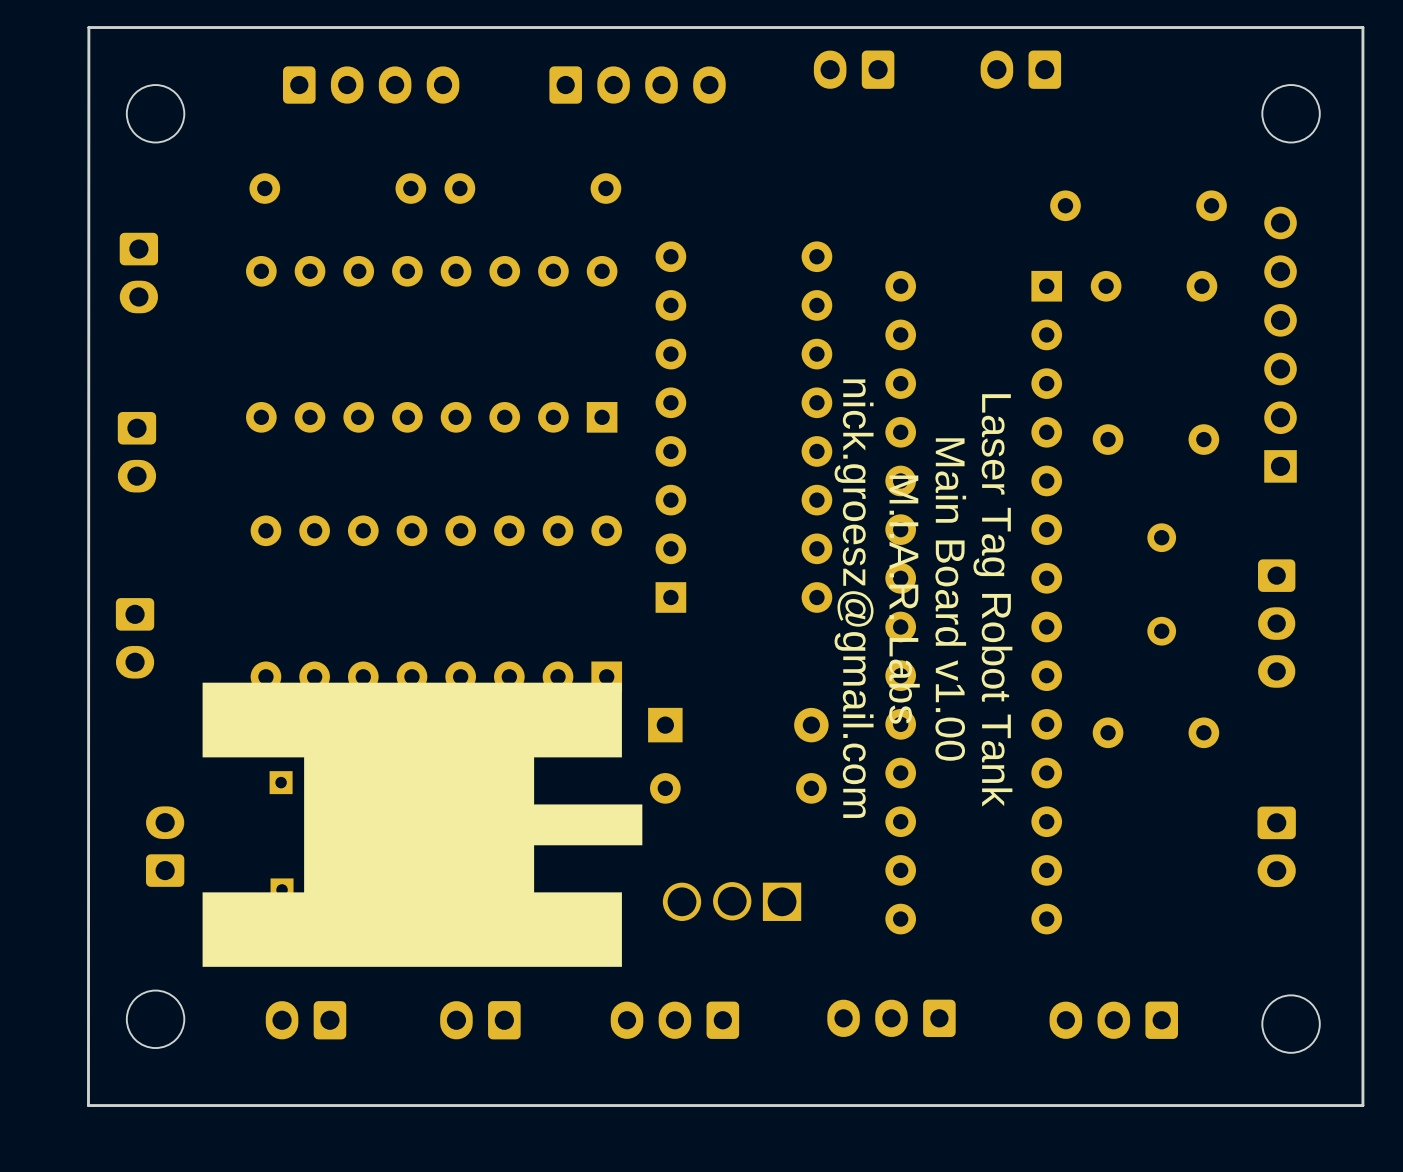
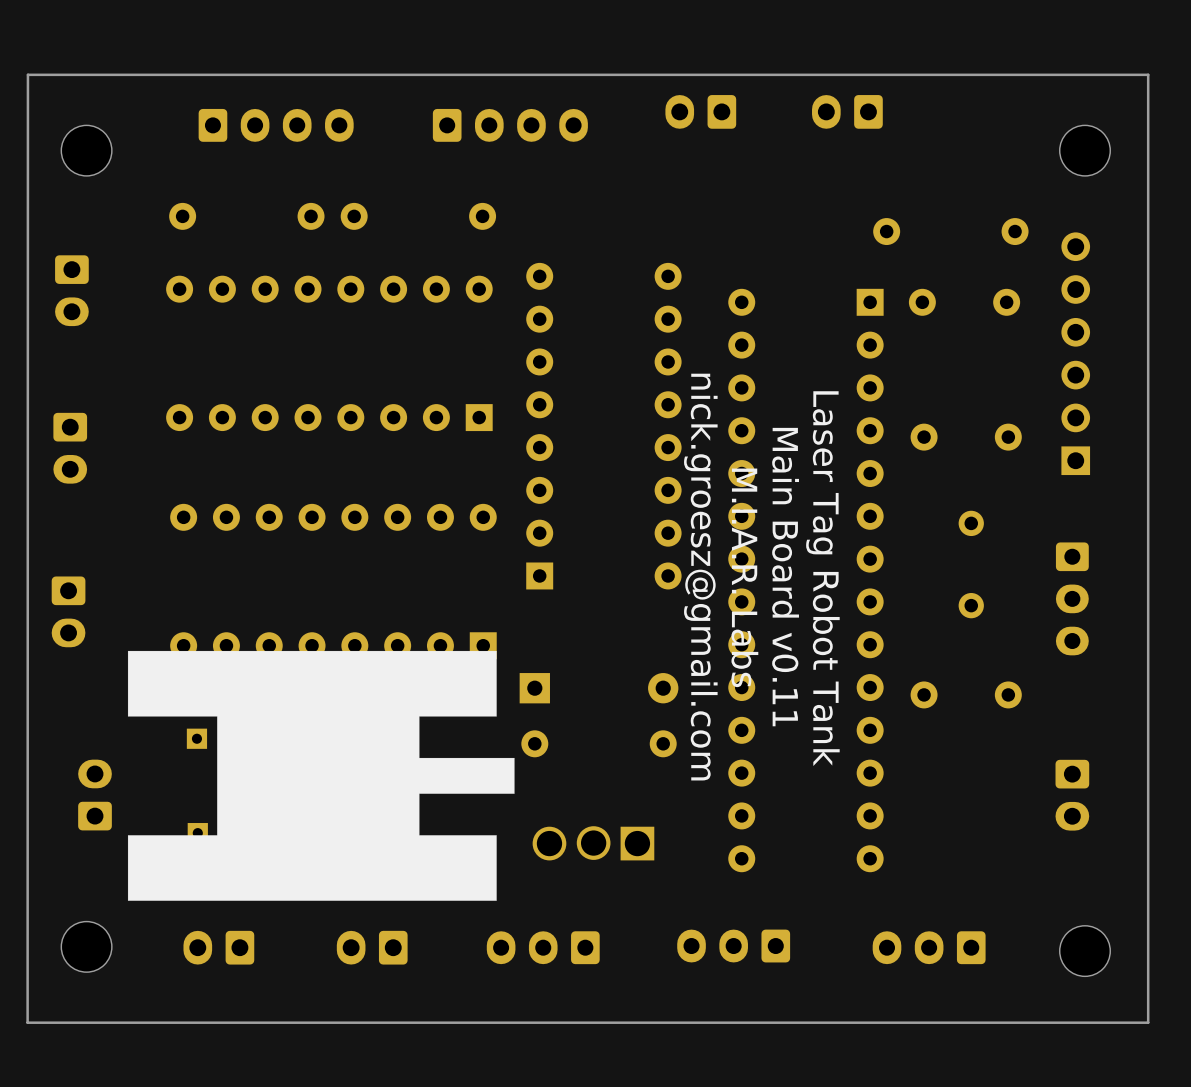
text: Main Board v1.00 (950, 599) -> Main Board v0.11 (785, 577)

